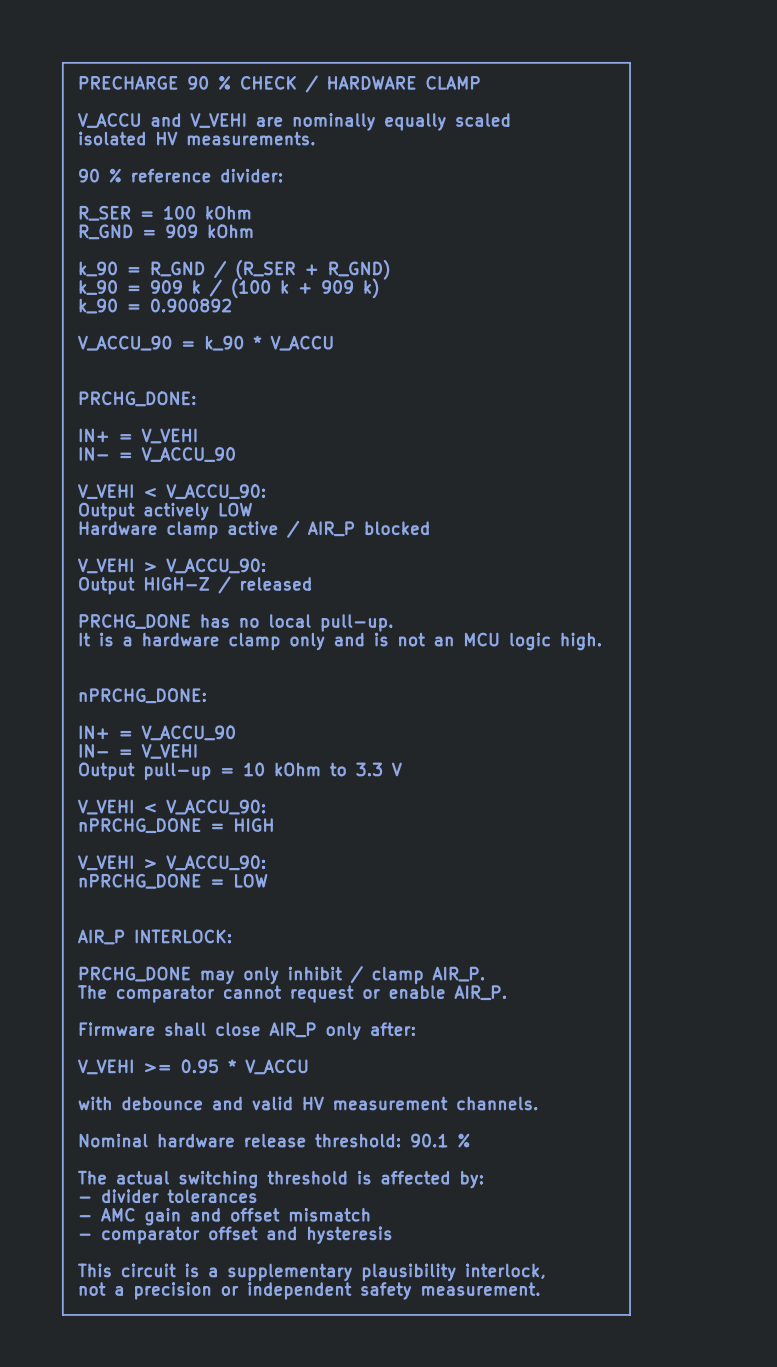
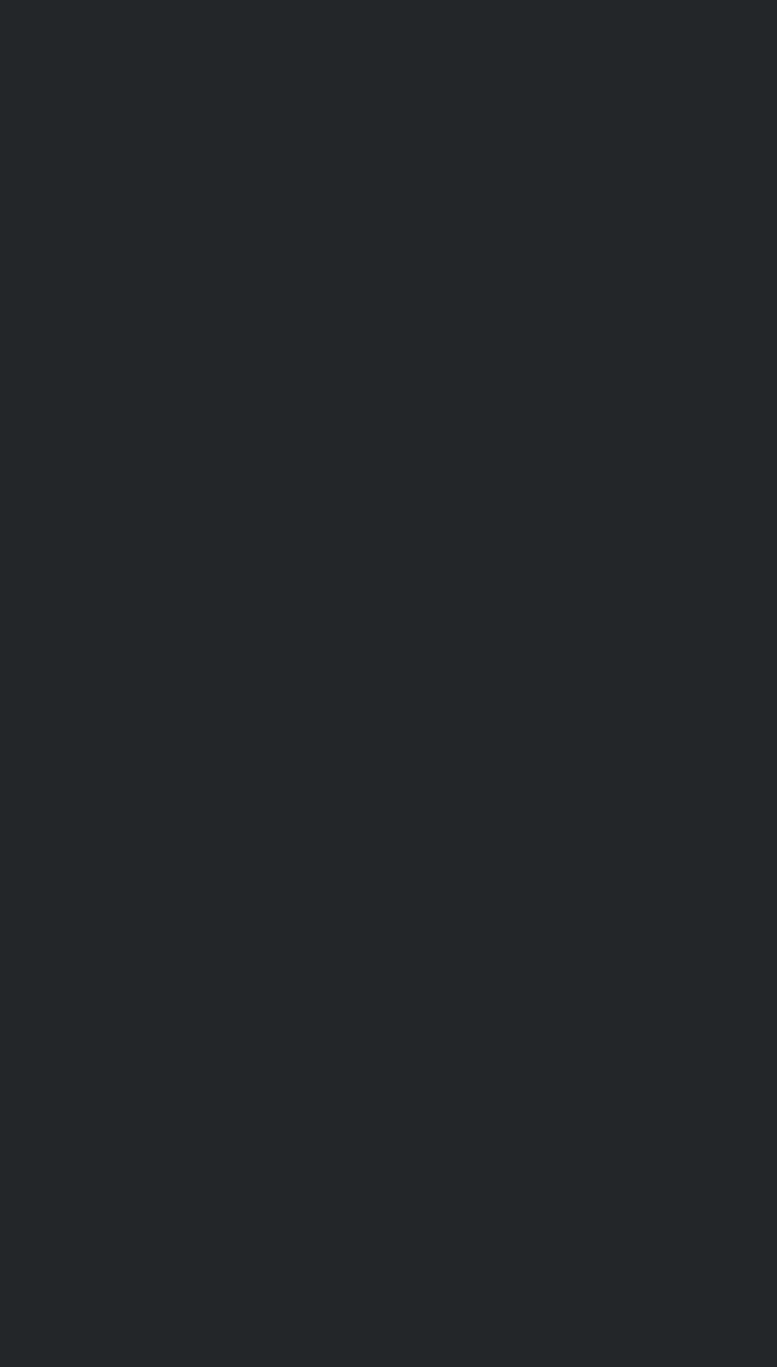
line: (62, 62) (630, 62) (630, 1314) (62, 1314) (62, 62) -> none
text: PRECHARGE 90 % CHECK / HARDWARE CLAMP (279, 83) -> none
text: V_ACCU and V_VEHI are nominally equally scaled (293, 121) -> none
text: isolated HV measurements. (196, 138) -> none
text: 90 % reference divider: (180, 175) -> none
text: R_SER = 100 kOhm (164, 213) -> none
text: R_GND = 909 kOhm (166, 231) -> none
text: k_90 = R_GND / (R_SER + R_GND) (234, 269) -> none
text: k_90 = 909 k / (100 k + 909 k) (228, 288) -> none
text: k_90 = 0.900892 (155, 306) -> none
text: V_ACCU_90 = k_90 * V_ACCU (205, 343) -> none
text: PRCHG_DONE: (137, 398) -> none
text: IN+ = V_VEHI (138, 435) -> none
text: IN- = V_ACCU_90 (157, 454) -> none
text: V_VEHI < V_ACCU_90: (171, 491) -> none
text: Output actively LOW (165, 511) -> none
text: Hardware clamp active / AIR_P blocked (254, 529) -> none
text: V_VEHI > V_ACCU_90: (171, 565) -> none
text: Output HIGH-Z / released (194, 585) -> none
text: PRCHG_DONE has no local pull-up. (236, 622) -> none
text: It is a hardware clamp only and is not an MCU logic high. (340, 641) -> none
text: nPRCHG_DONE: (142, 695) -> none
text: IN+ = V_ACCU_90 (157, 732) -> none
text: IN- = V_VEHI (138, 751) -> none
text: Output pull-up = 10 kOhm to 3.3 V (240, 771) -> none
text: V_VEHI < V_ACCU_90: (171, 807) -> none
text: nPRCHG_DONE = HIGH (176, 825) -> none
text: V_VEHI > V_ACCU_90: (171, 862) -> none
text: nPRCHG_DONE = LOW (173, 881) -> none
text: AIR_P INTERLOCK: (154, 937) -> none
text: PRCHG_DONE may only inhibit / clamp AIR_P. (281, 975) -> none
text: The comparator cannot request or enable AIR_P. (292, 994) -> none
text: Firmware shall close AIR_P only after: (247, 1031) -> none
text: V_VEHI >= 0.95 * V_ACCU (192, 1066) -> none
text: with debounce and valid HV measurement channels. (307, 1103) -> none
text: Nominal hardware release threshold: 90.1 % (274, 1140) -> none
text: The actual switching threshold is affected by: (280, 1179) -> none
text: - divider tolerances (168, 1196) -> none
text: - AMC gain and offset mismatch (224, 1216) -> none
text: - comparator offset and hysteresis (235, 1235) -> none
text: This circuit is a supplementary plausibility interlock, (311, 1272) -> none
text: not a precision or independent safety measurement. (309, 1290) -> none

